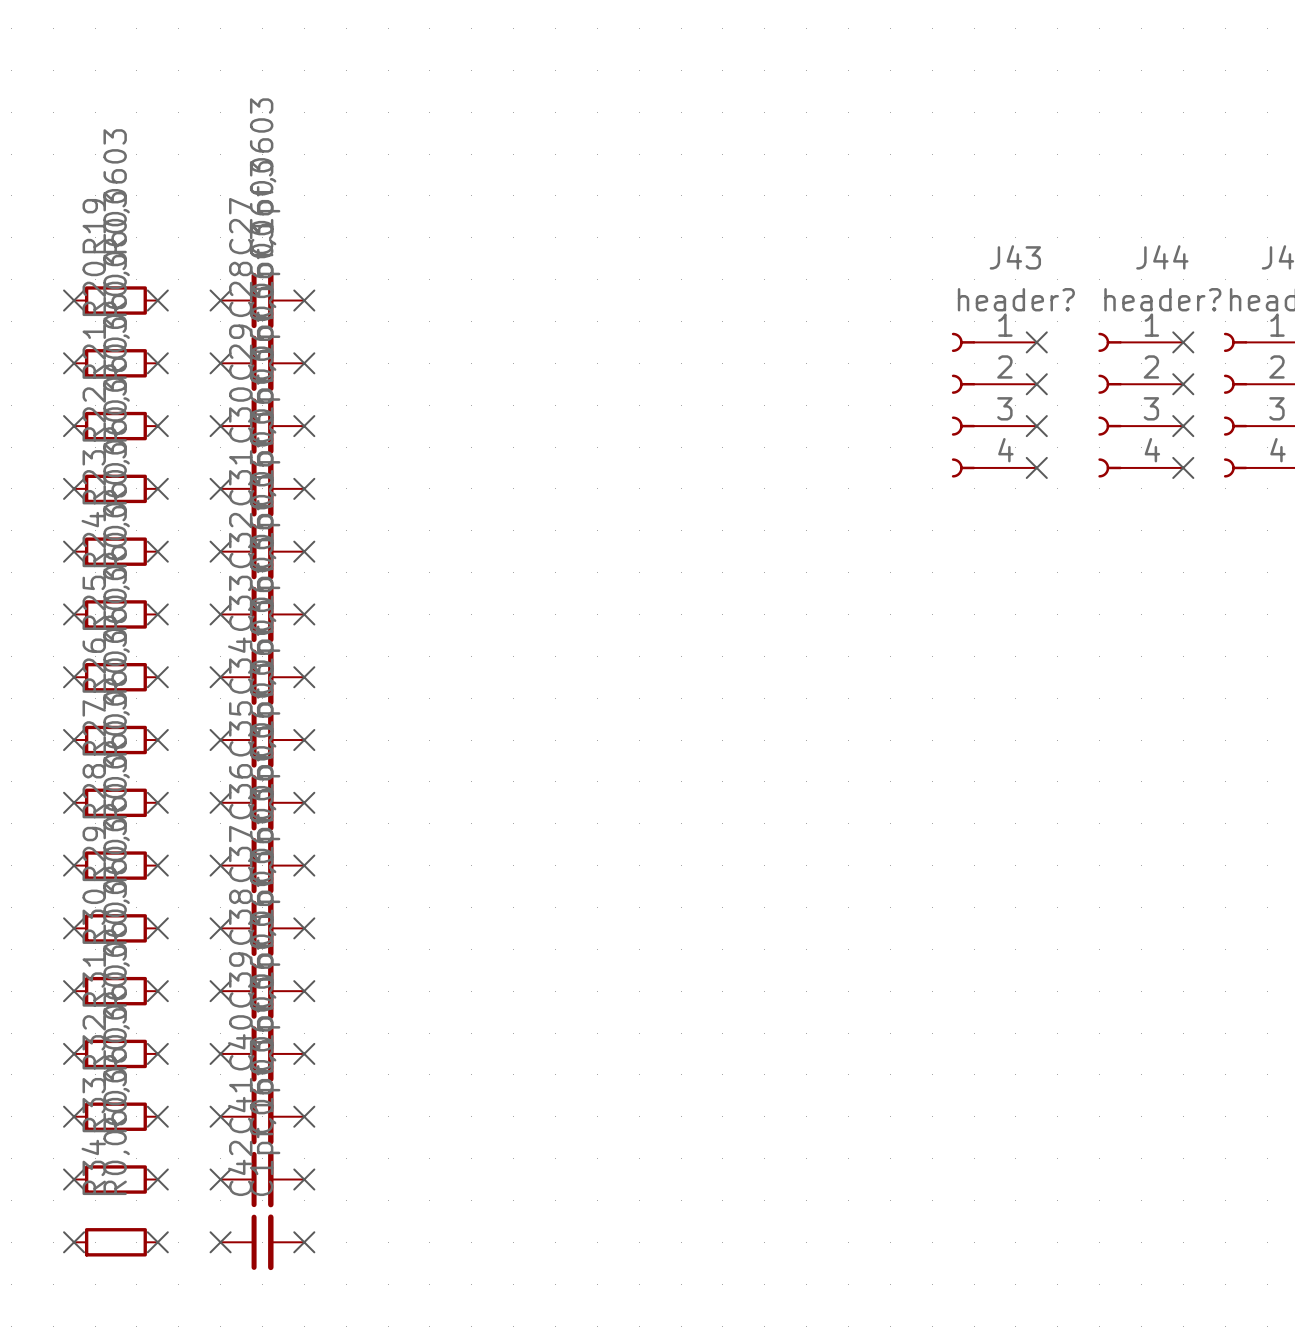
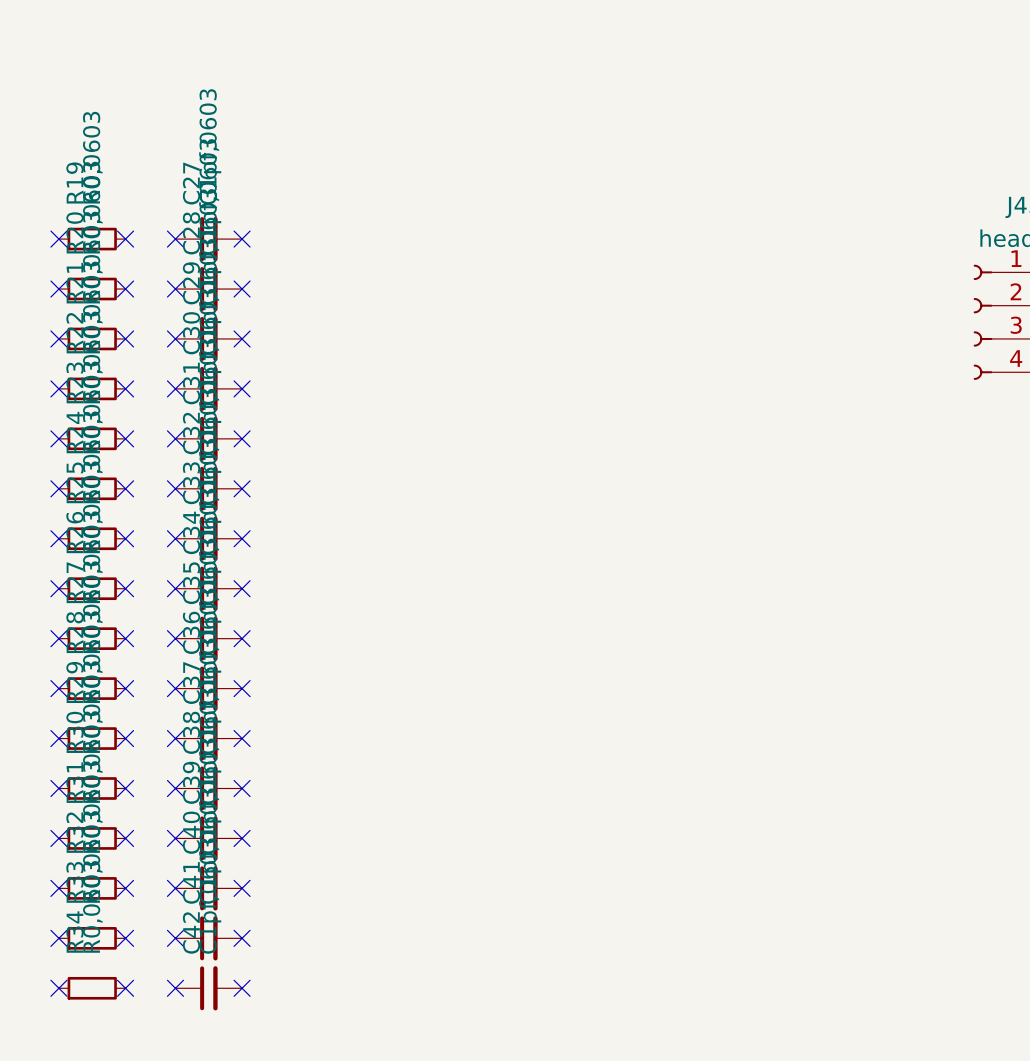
no-connect mark: (1036, 342) -> none
no-connect mark: (1183, 342) -> none
no-connect mark: (1036, 384) -> none
no-connect mark: (1183, 384) -> none
J43: header? (994, 405) -> none
J44: header? (1140, 405) -> none
no-connect mark: (1036, 426) -> none
no-connect mark: (1183, 426) -> none
no-connect mark: (1036, 467) -> none
no-connect mark: (1183, 467) -> none

